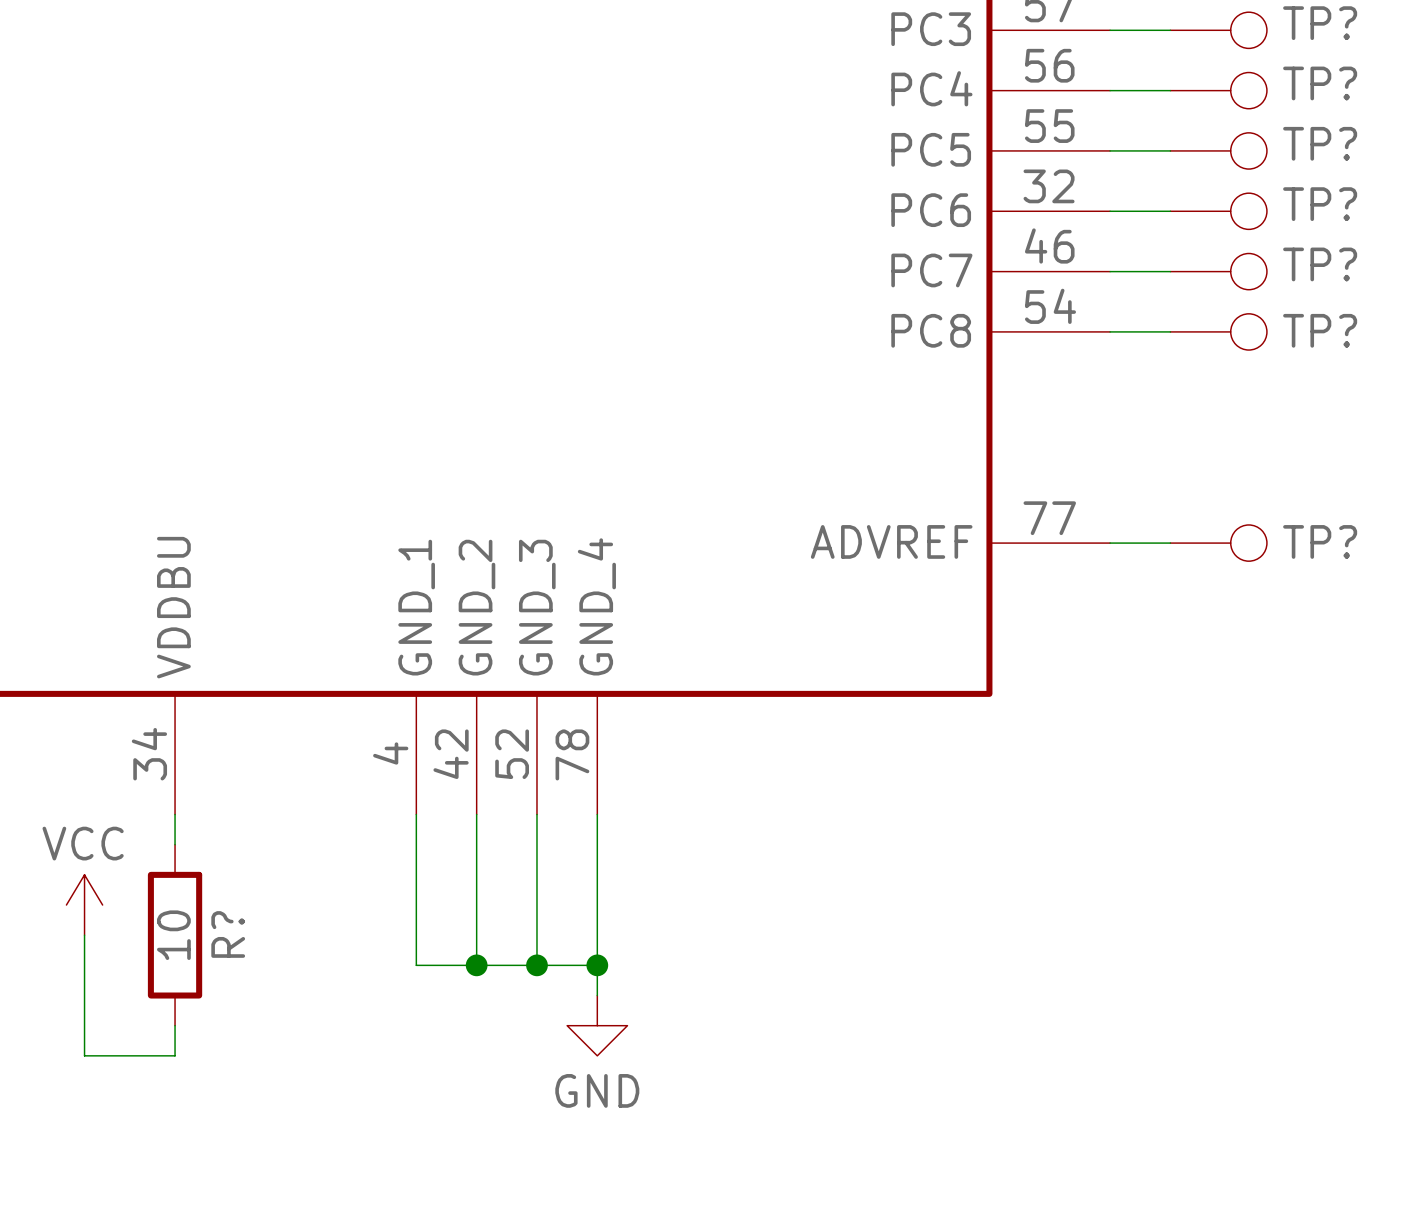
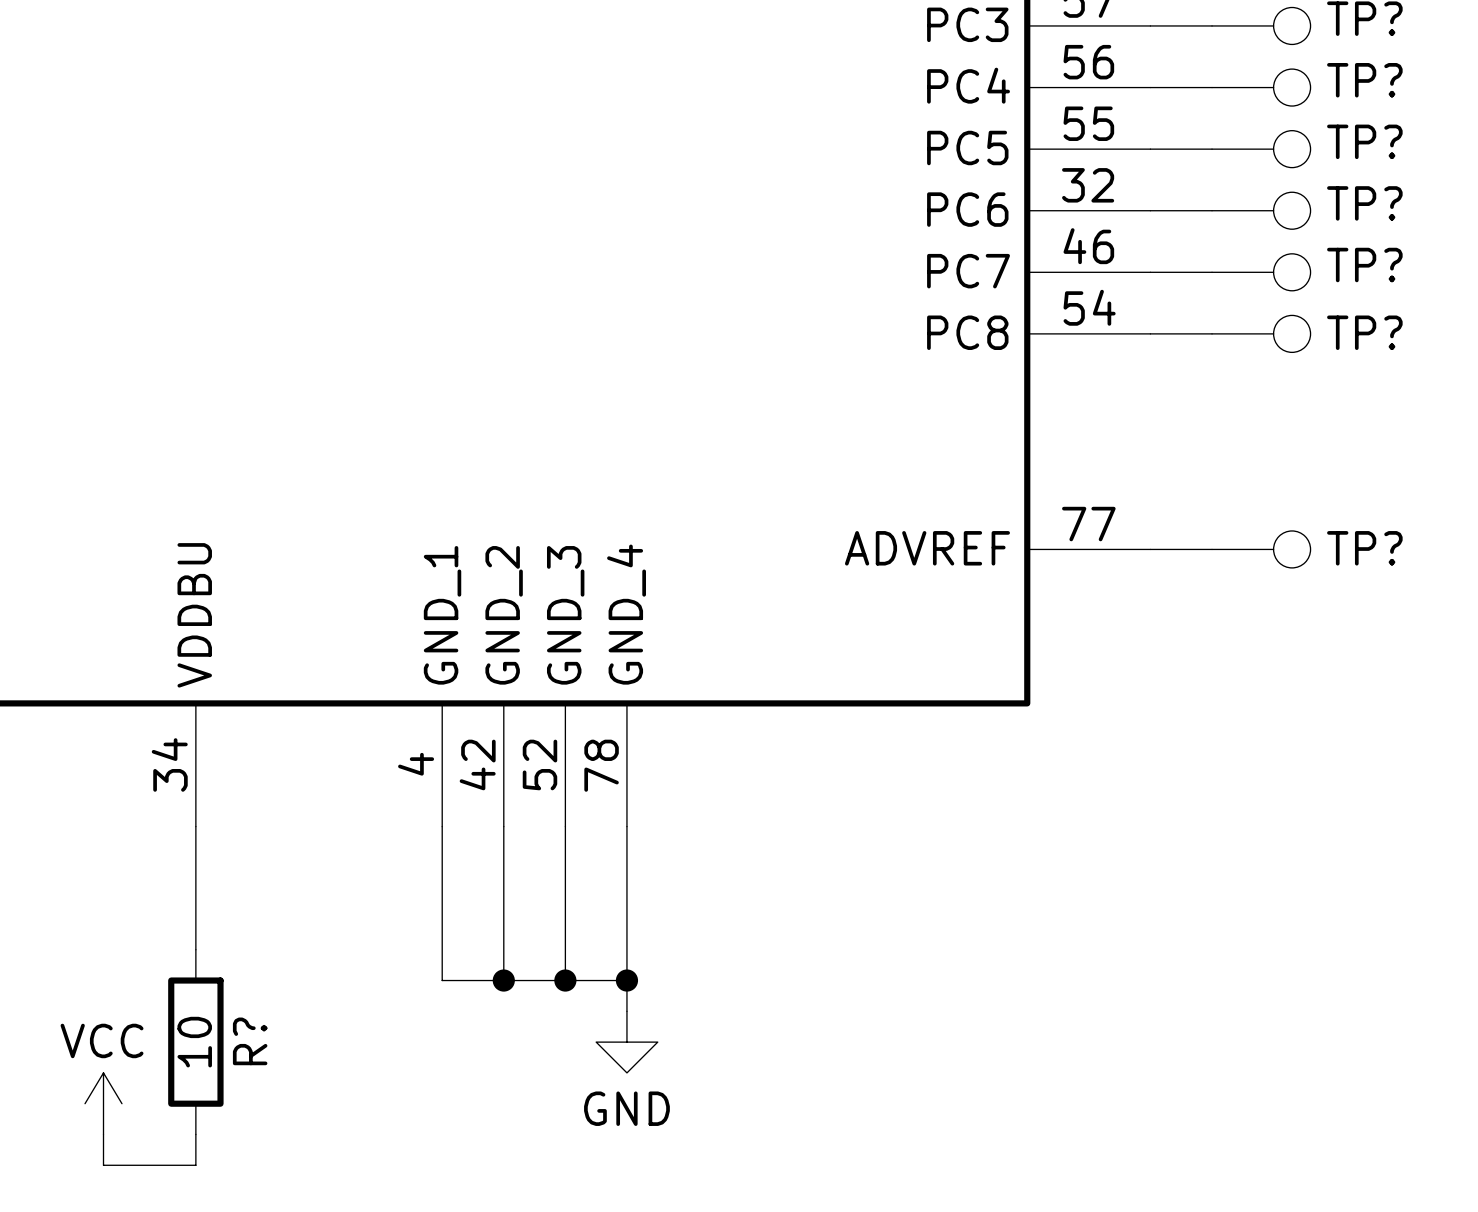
wire: none -> (195, 857) (195, 949)
power symbol position: VCC (84, 905) -> VCC (103, 1103)
wire: (84, 935) (84, 1055) (175, 1055) (175, 1025) -> none
R? position: (175, 935) -> (195, 1042)
wire: none -> (103, 1134) (103, 1165) (195, 1165) (195, 1134)

